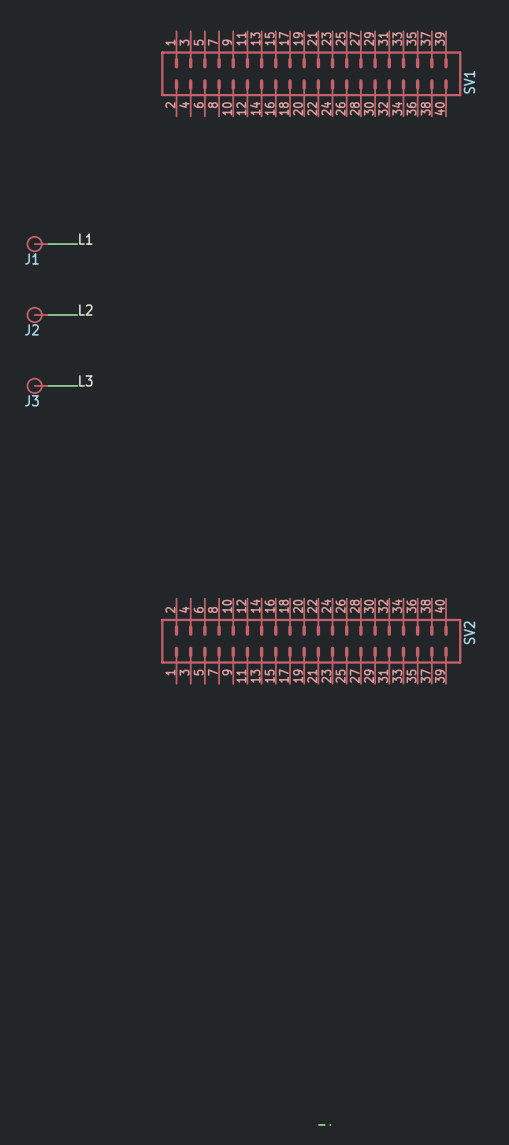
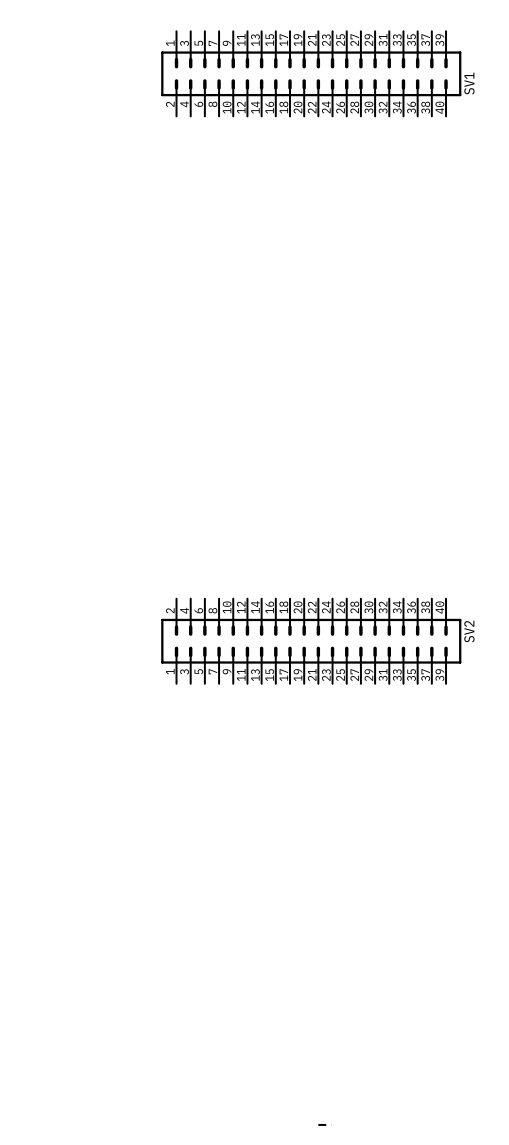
label: L1 (85, 239) -> none
J1: (37, 244) -> none
wire: (48, 244) (77, 244) -> none
label: L2 (85, 310) -> none
J2: (37, 314) -> none
wire: (48, 314) (77, 314) -> none
label: L3 (85, 380) -> none
J3: (37, 385) -> none
wire: (48, 385) (77, 385) -> none

